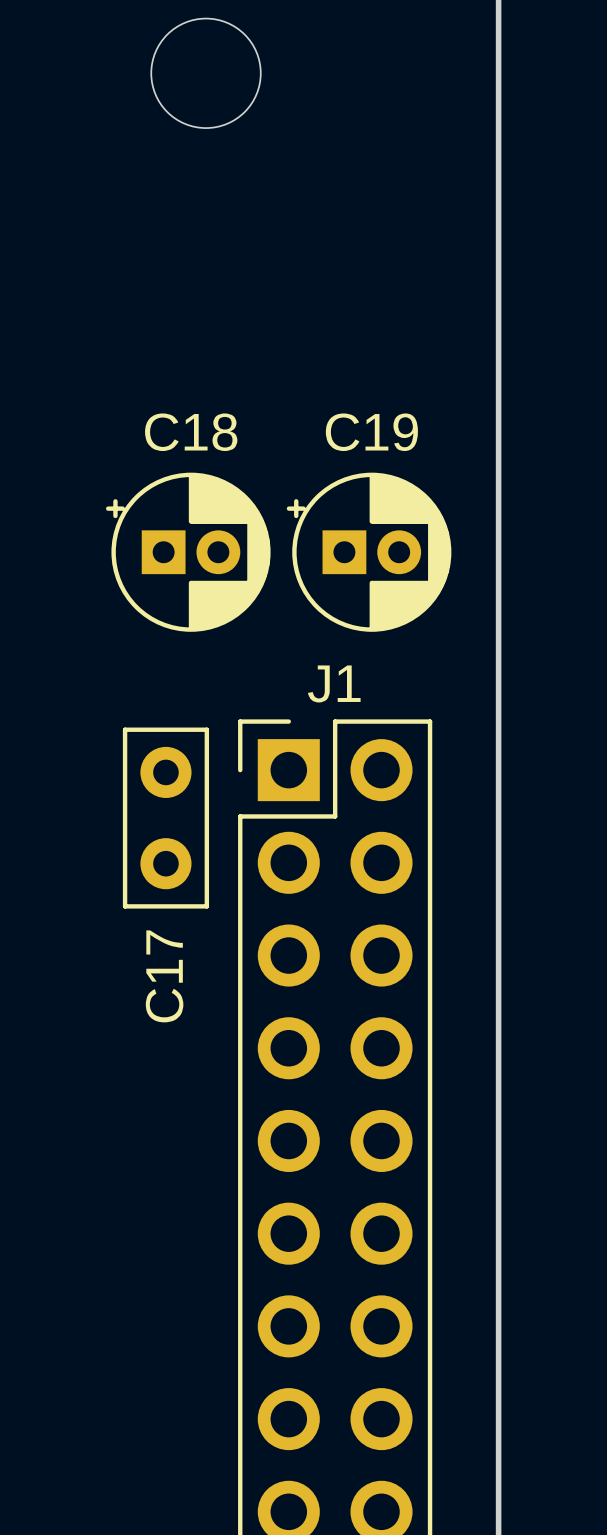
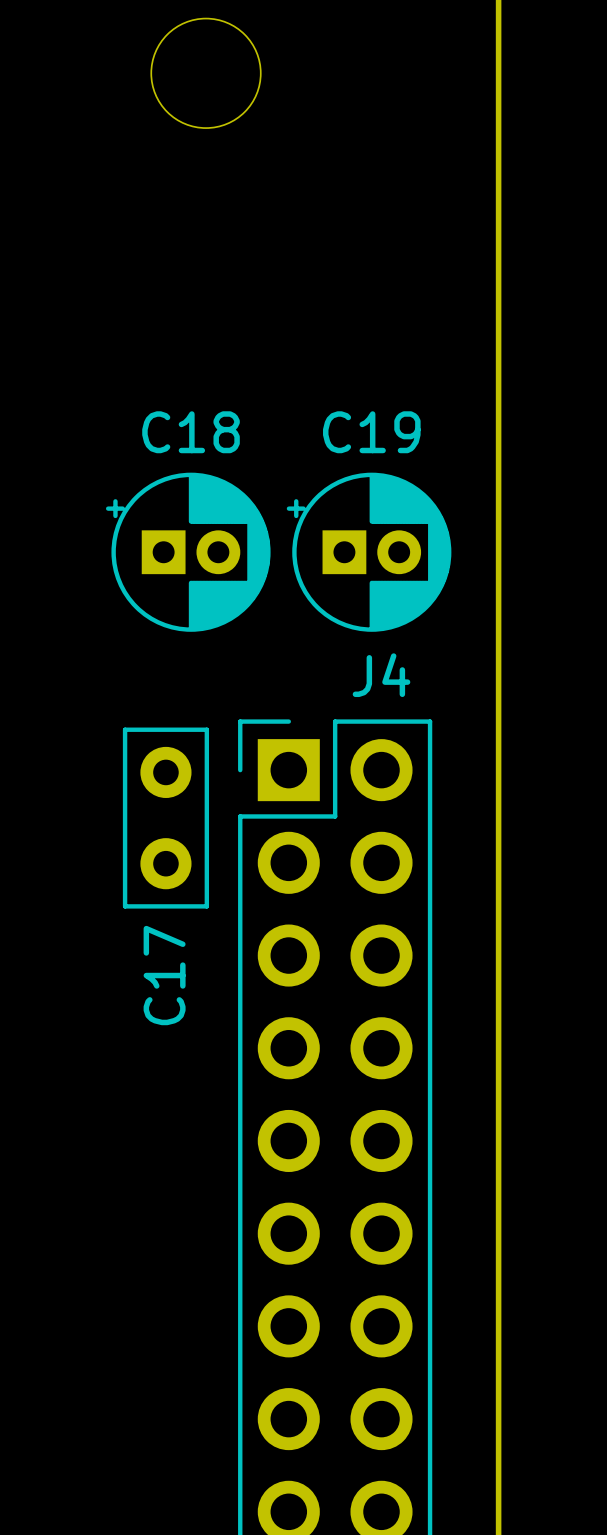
J1 name: J1 (334, 683) -> J4 (381, 675)

